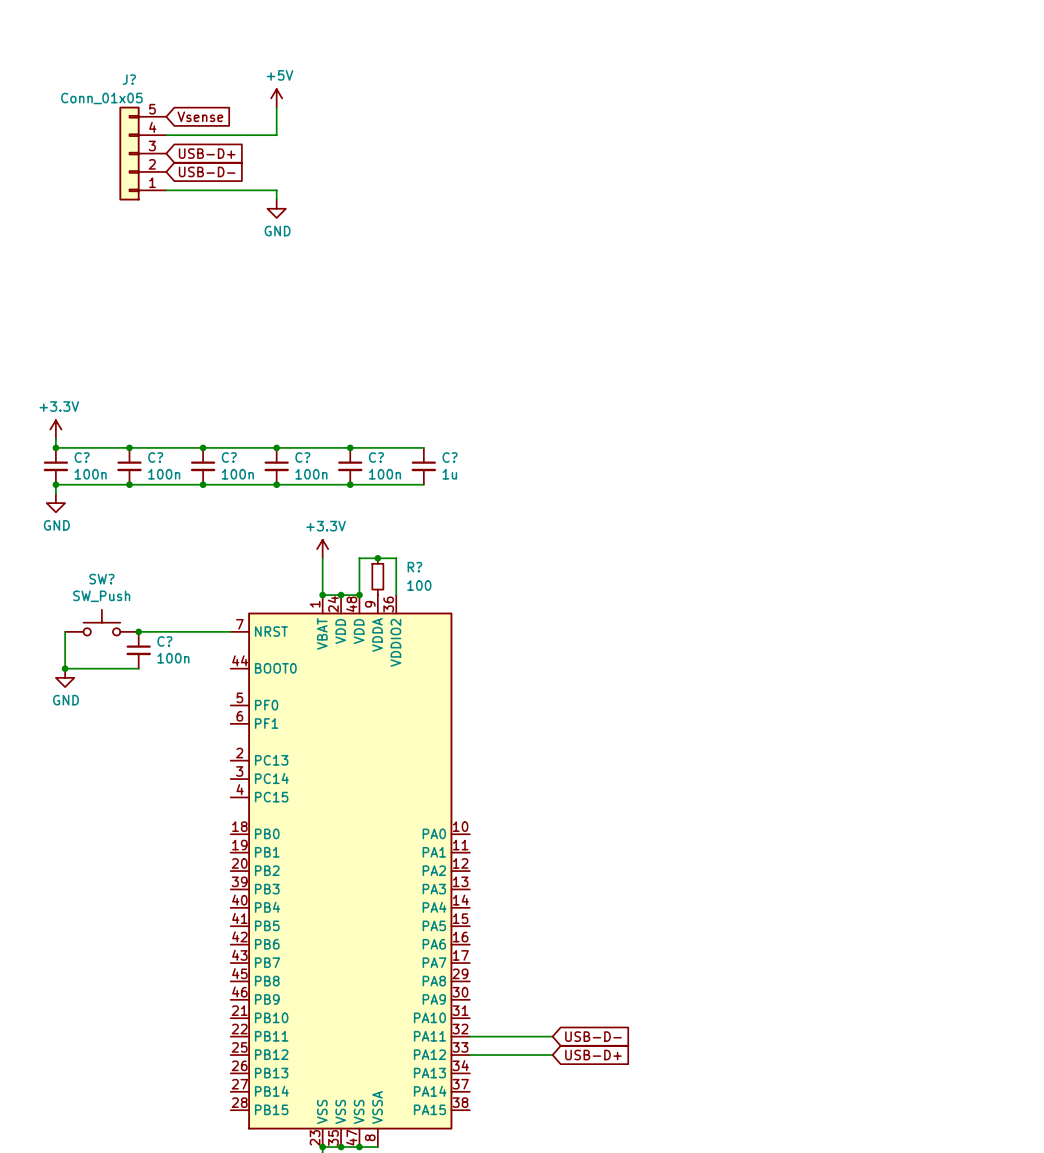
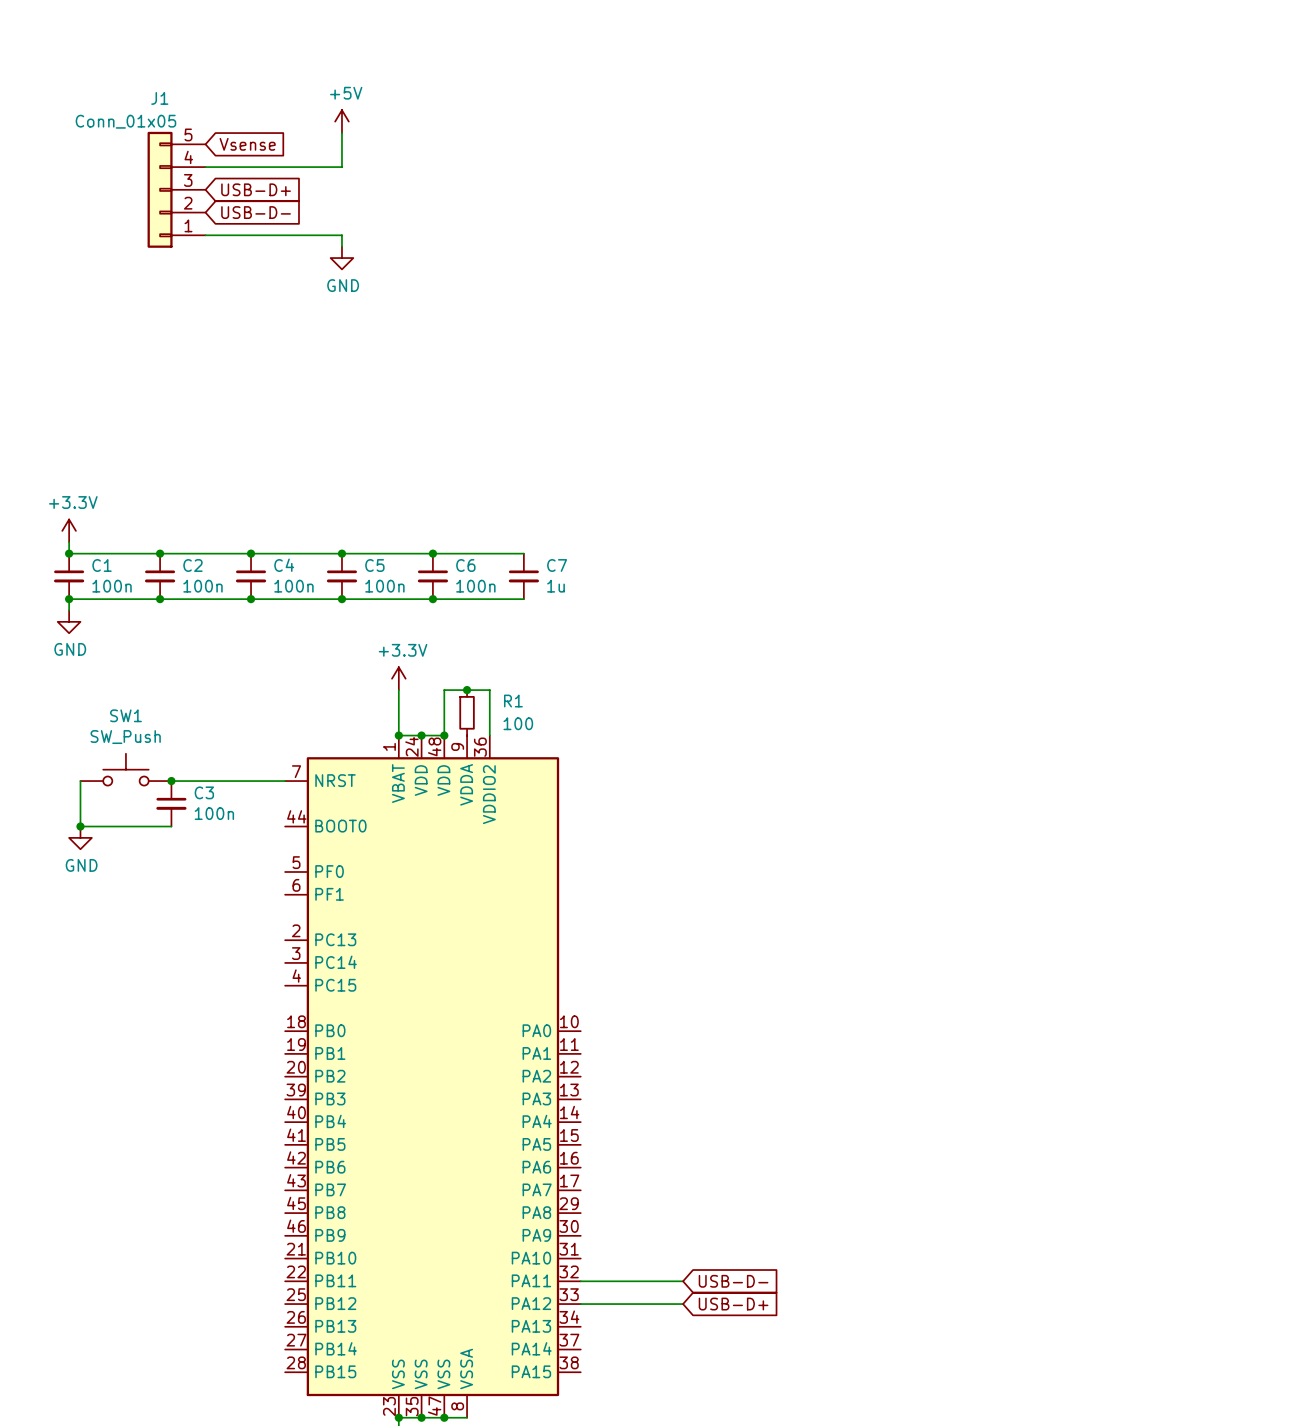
J? name: J? (129, 79) -> J1 (159, 98)
C? name: C? (82, 457) -> C1 (102, 565)
C? name: C? (155, 457) -> C2 (192, 565)
C? name: C? (229, 457) -> C4 (284, 565)
C? name: C? (302, 457) -> C5 (374, 565)
C? name: C? (376, 457) -> C6 (465, 565)
C? name: C? (450, 457) -> C7 (557, 565)
R? name: R? (414, 567) -> R1 (513, 701)
SW? name: SW? (101, 579) -> SW1 (125, 715)
C? name: C? (164, 641) -> C3 (204, 792)

